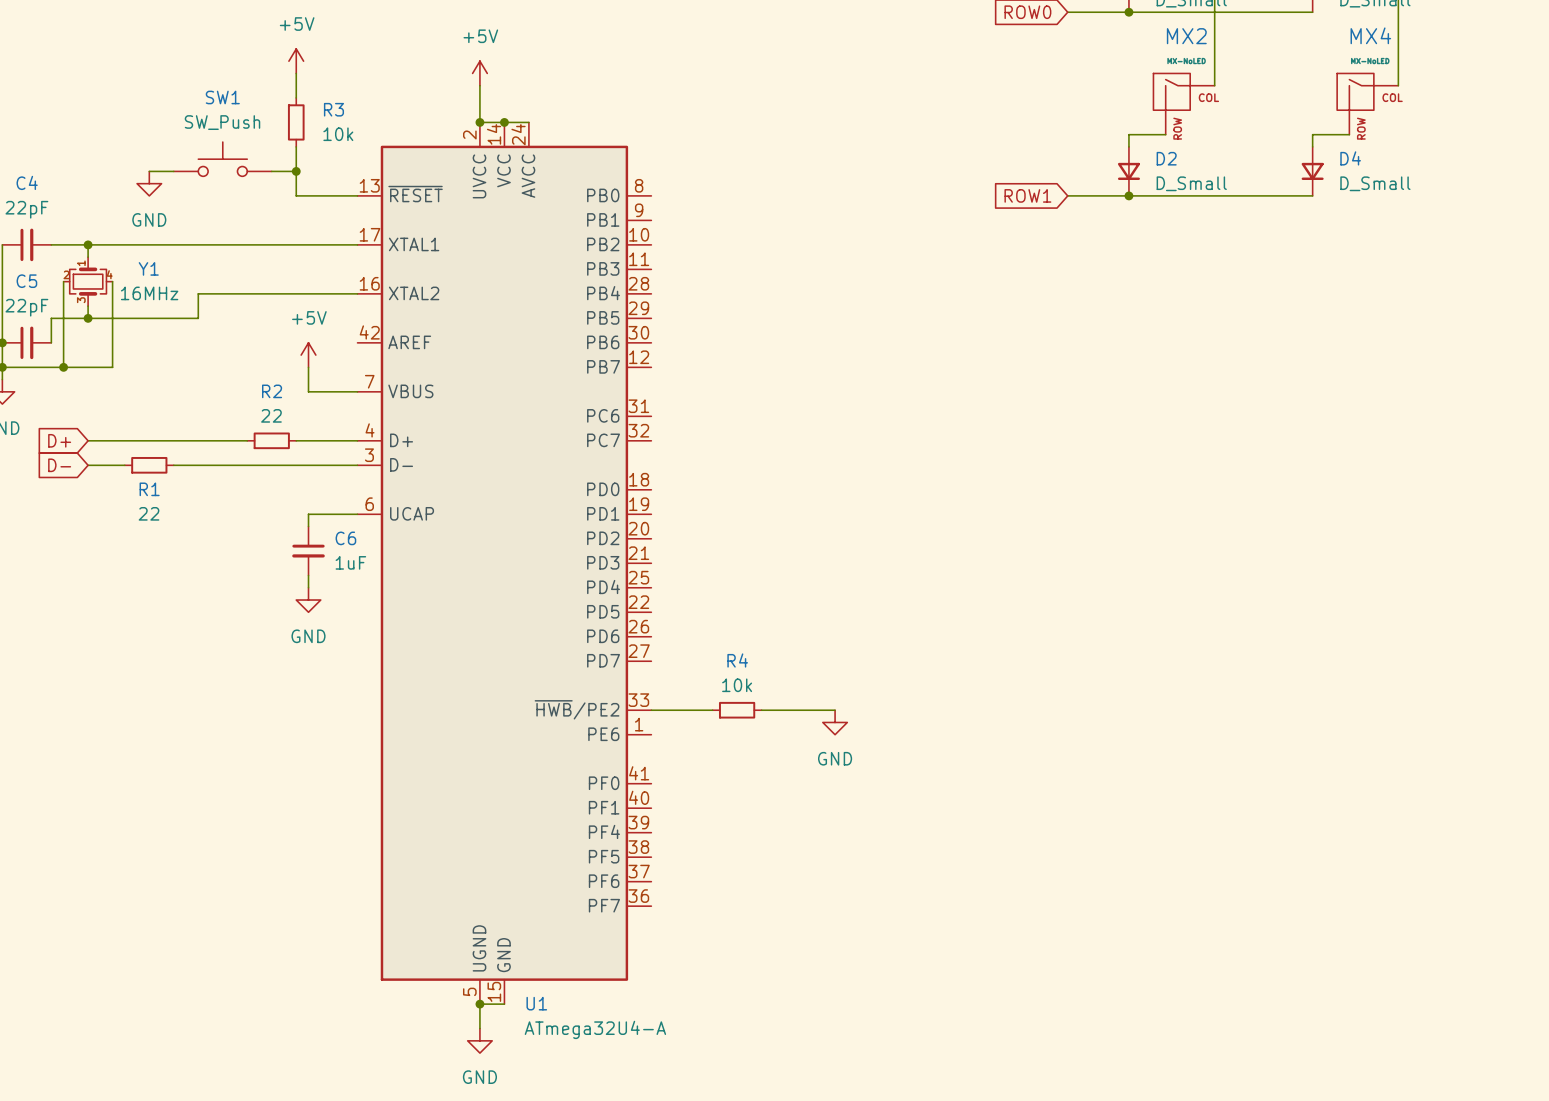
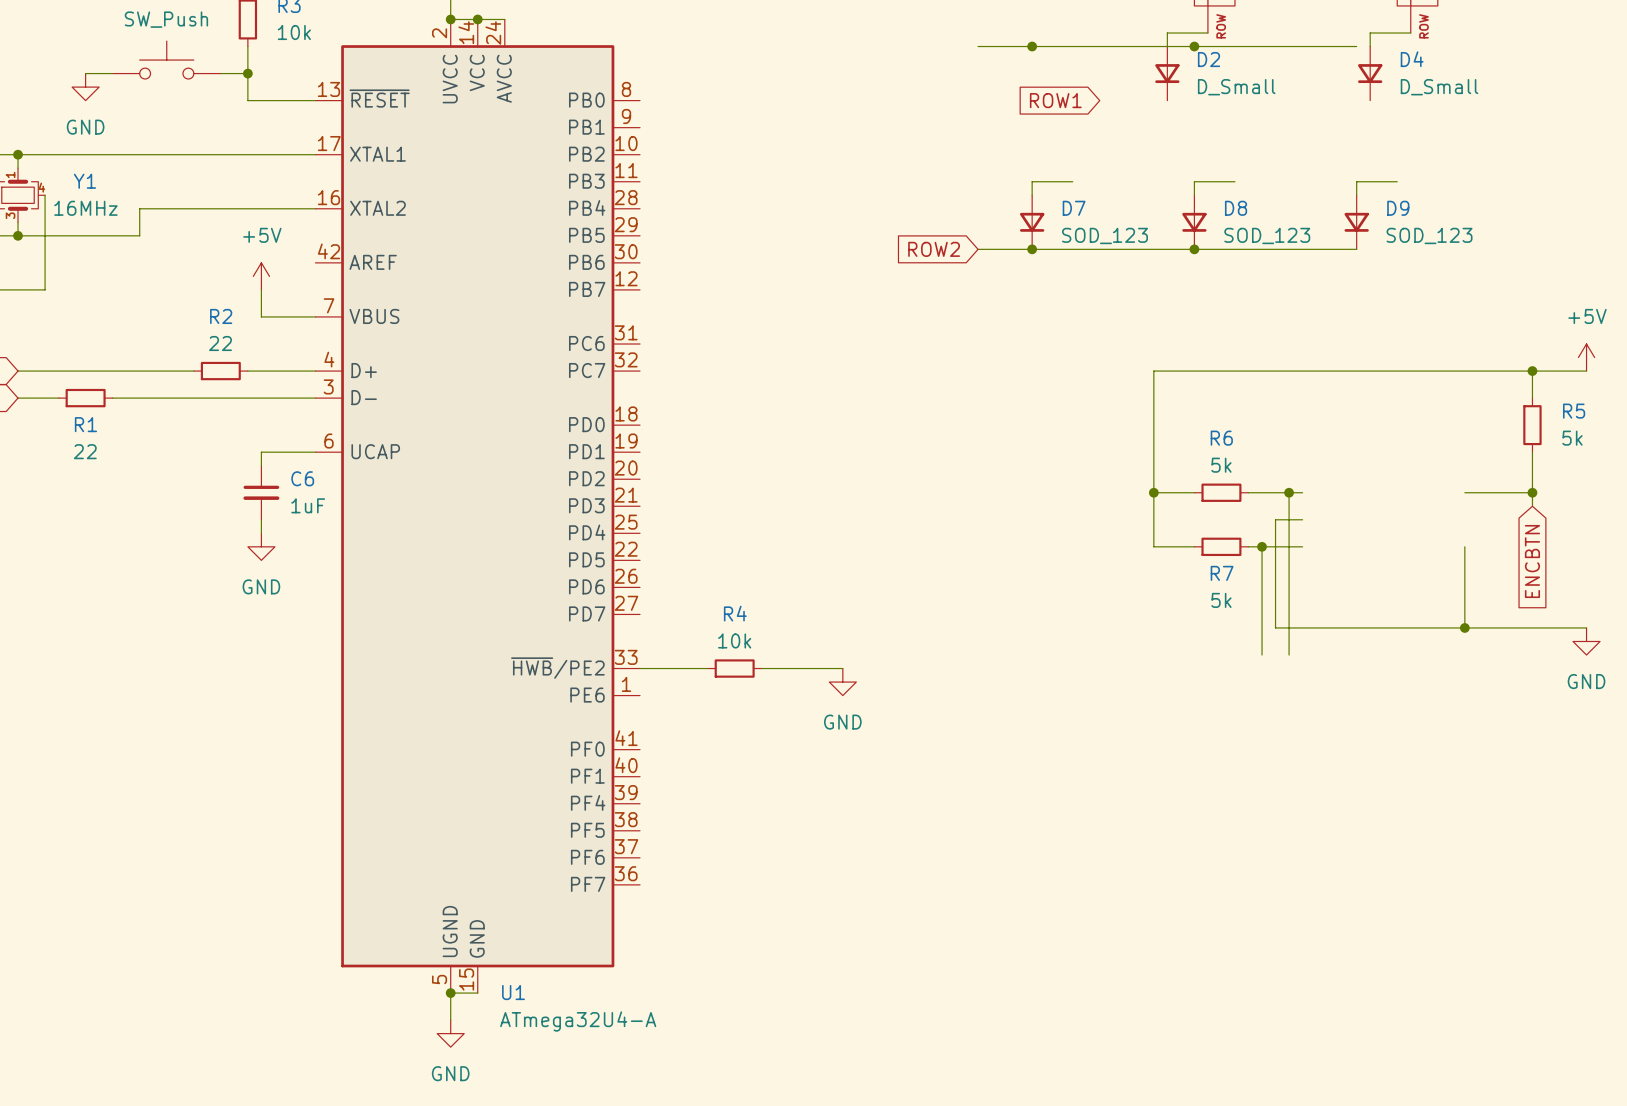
wire: none -> (978, 46) (1356, 46)
junction: none -> (1032, 46)
wire: (1067, 195) (1312, 195) -> none
junction position: (1128, 195) -> (1194, 46)
wire: none -> (1072, 181) (1032, 181) (1032, 195)
wire: none -> (1234, 181) (1194, 181) (1194, 195)
wire: none -> (1397, 181) (1356, 181) (1356, 195)
D7: none -> SOD_123 (1032, 222)
D8: none -> SOD_123 (1194, 222)
D9: none -> SOD_123 (1356, 222)
global label: none -> ROW2 (934, 249)
wire: none -> (978, 249) (1356, 249)
junction: none -> (1032, 249)
junction: none -> (1194, 249)
power symbol: none -> +5V (1586, 357)
wire: none -> (1532, 371) (1532, 398)
junction: none -> (1532, 371)
wire: none -> (1586, 371) (1153, 371) (1153, 546) (1194, 546)
R5: none -> 5k (1532, 425)
wire: none -> (1532, 452) (1532, 506)
wire: none -> (1153, 492) (1194, 492)
junction: none -> (1153, 492)
R6: none -> 5k (1221, 492)
wire: none -> (1248, 492) (1302, 492)
wire: none -> (1289, 492) (1289, 655)
junction: none -> (1289, 492)
wire: none -> (1464, 492) (1532, 492)
junction: none -> (1532, 492)
wire: none -> (1302, 519) (1275, 519) (1275, 627) (1586, 627)
R7: none -> 5k (1221, 546)
wire: none -> (1248, 546) (1302, 546)
wire: none -> (1262, 546) (1262, 655)
junction: none -> (1262, 546)
wire: none -> (1464, 546) (1464, 627)
global label: none -> ENCBTN (1532, 561)
junction: none -> (1464, 627)
power symbol: none -> GND (1586, 641)

